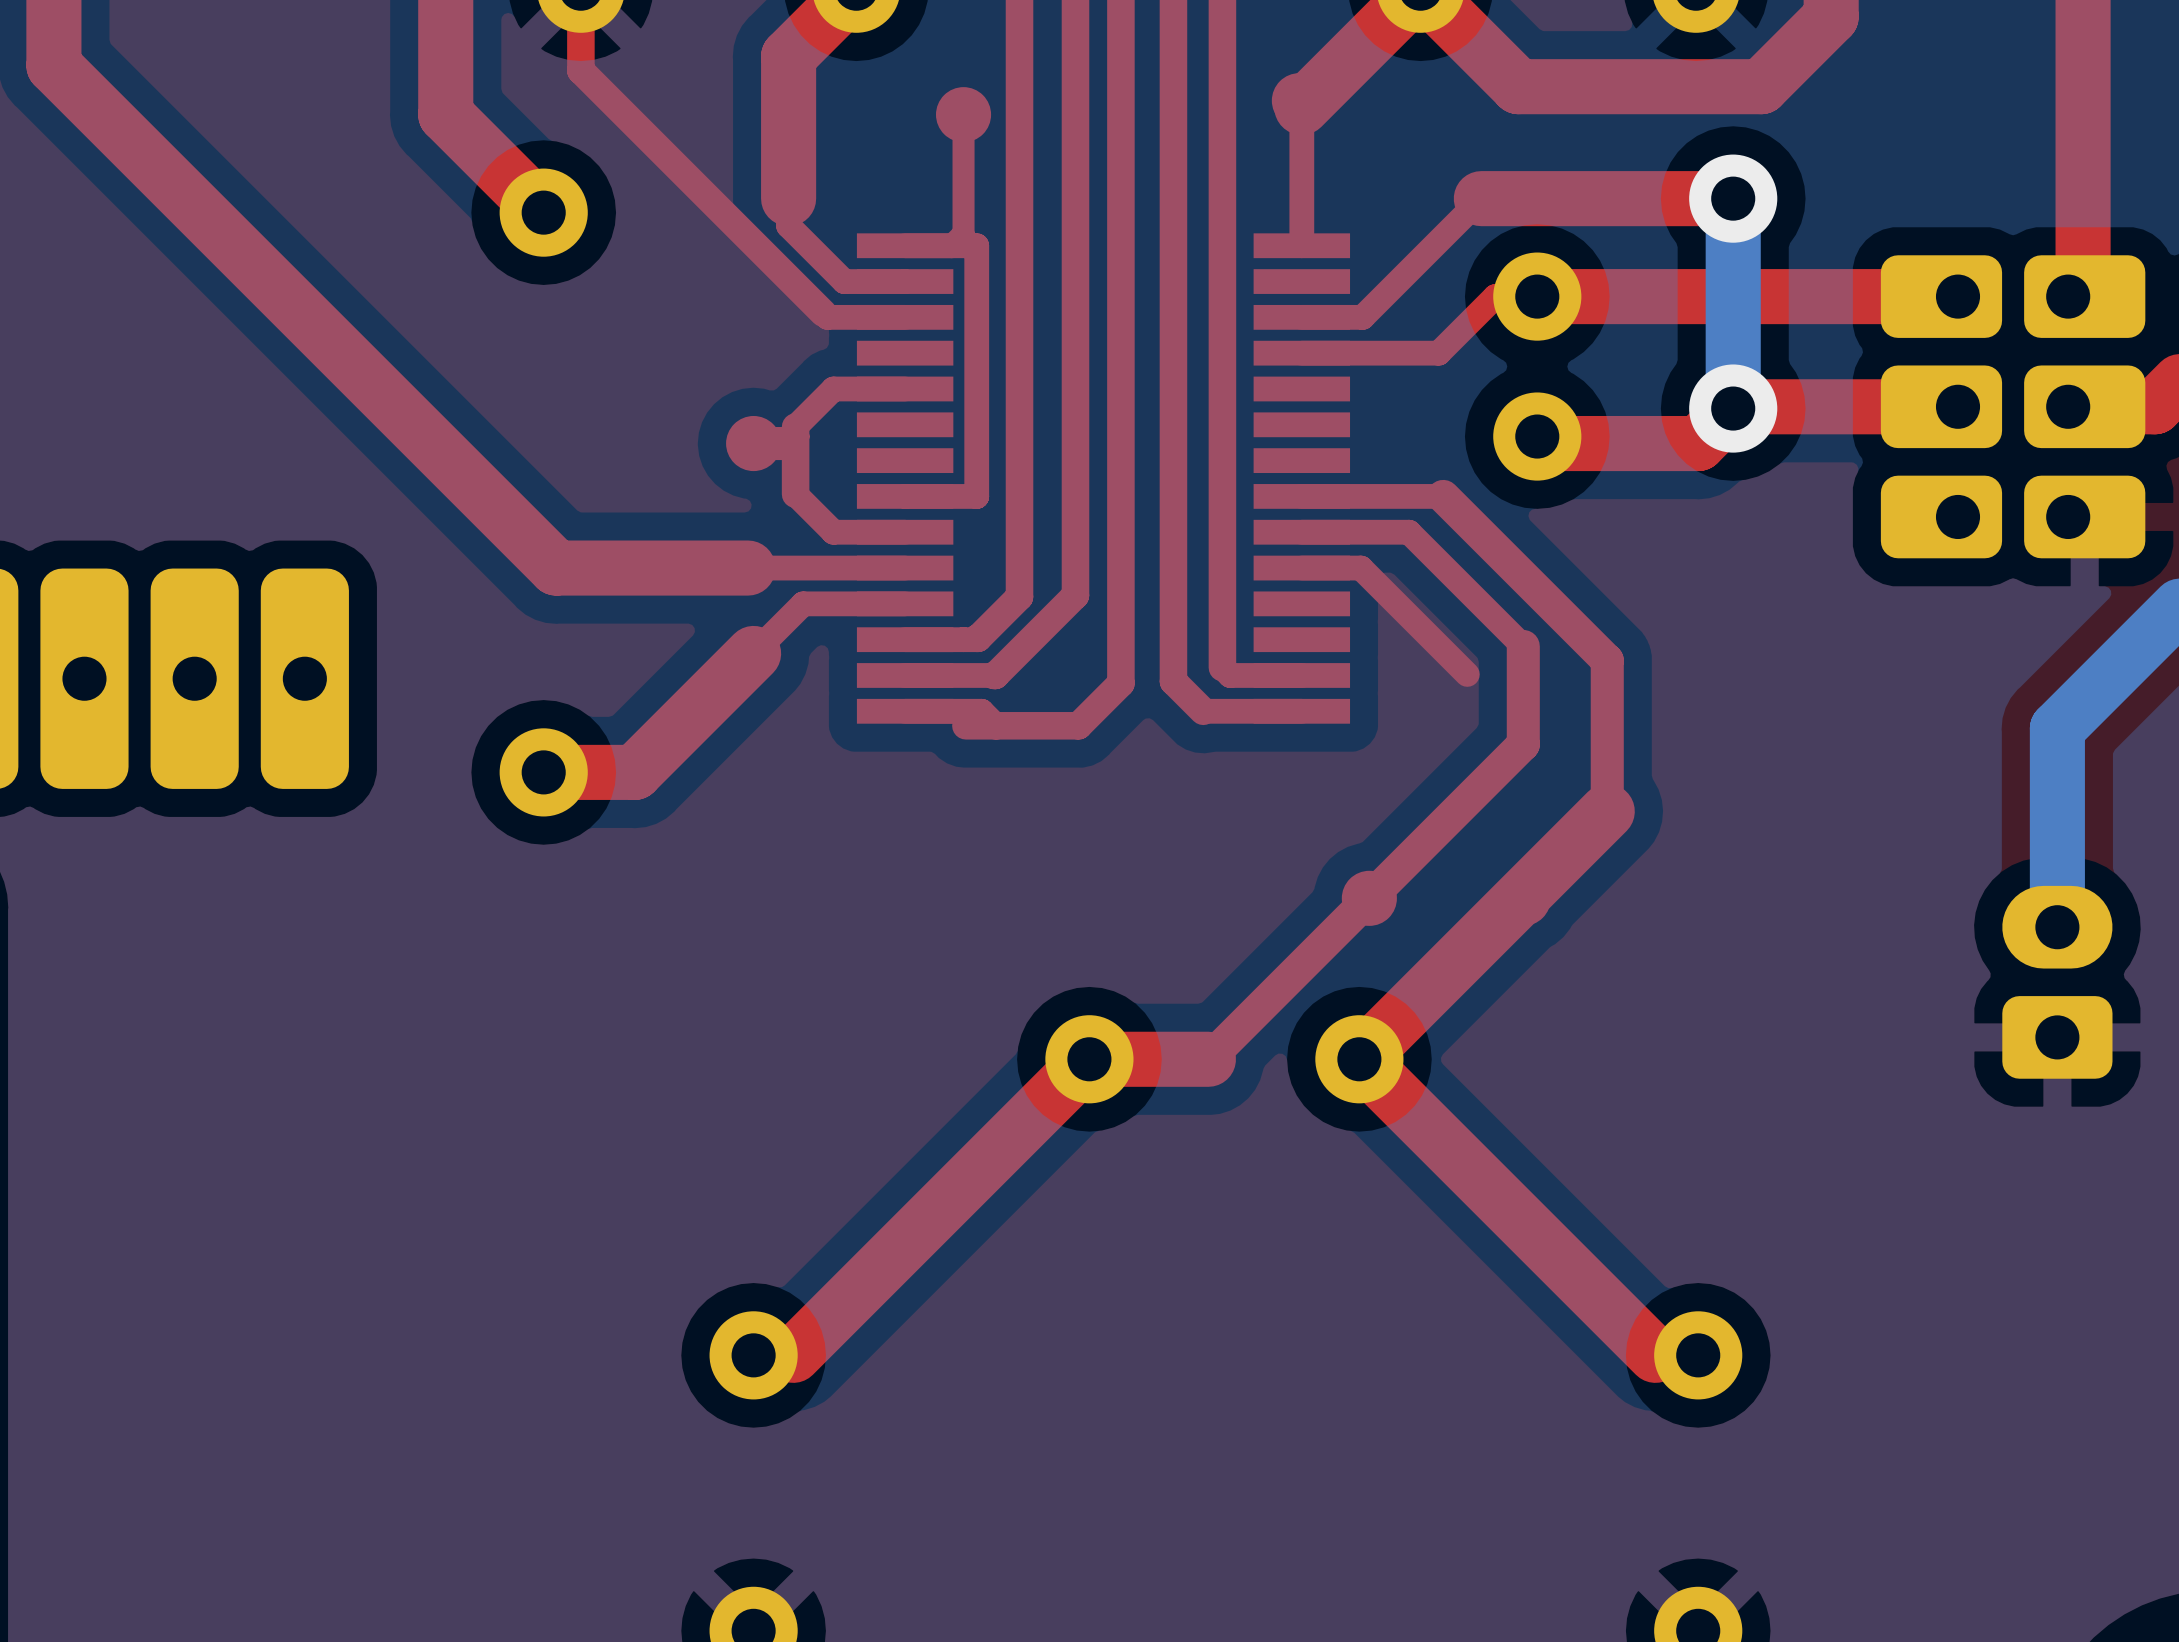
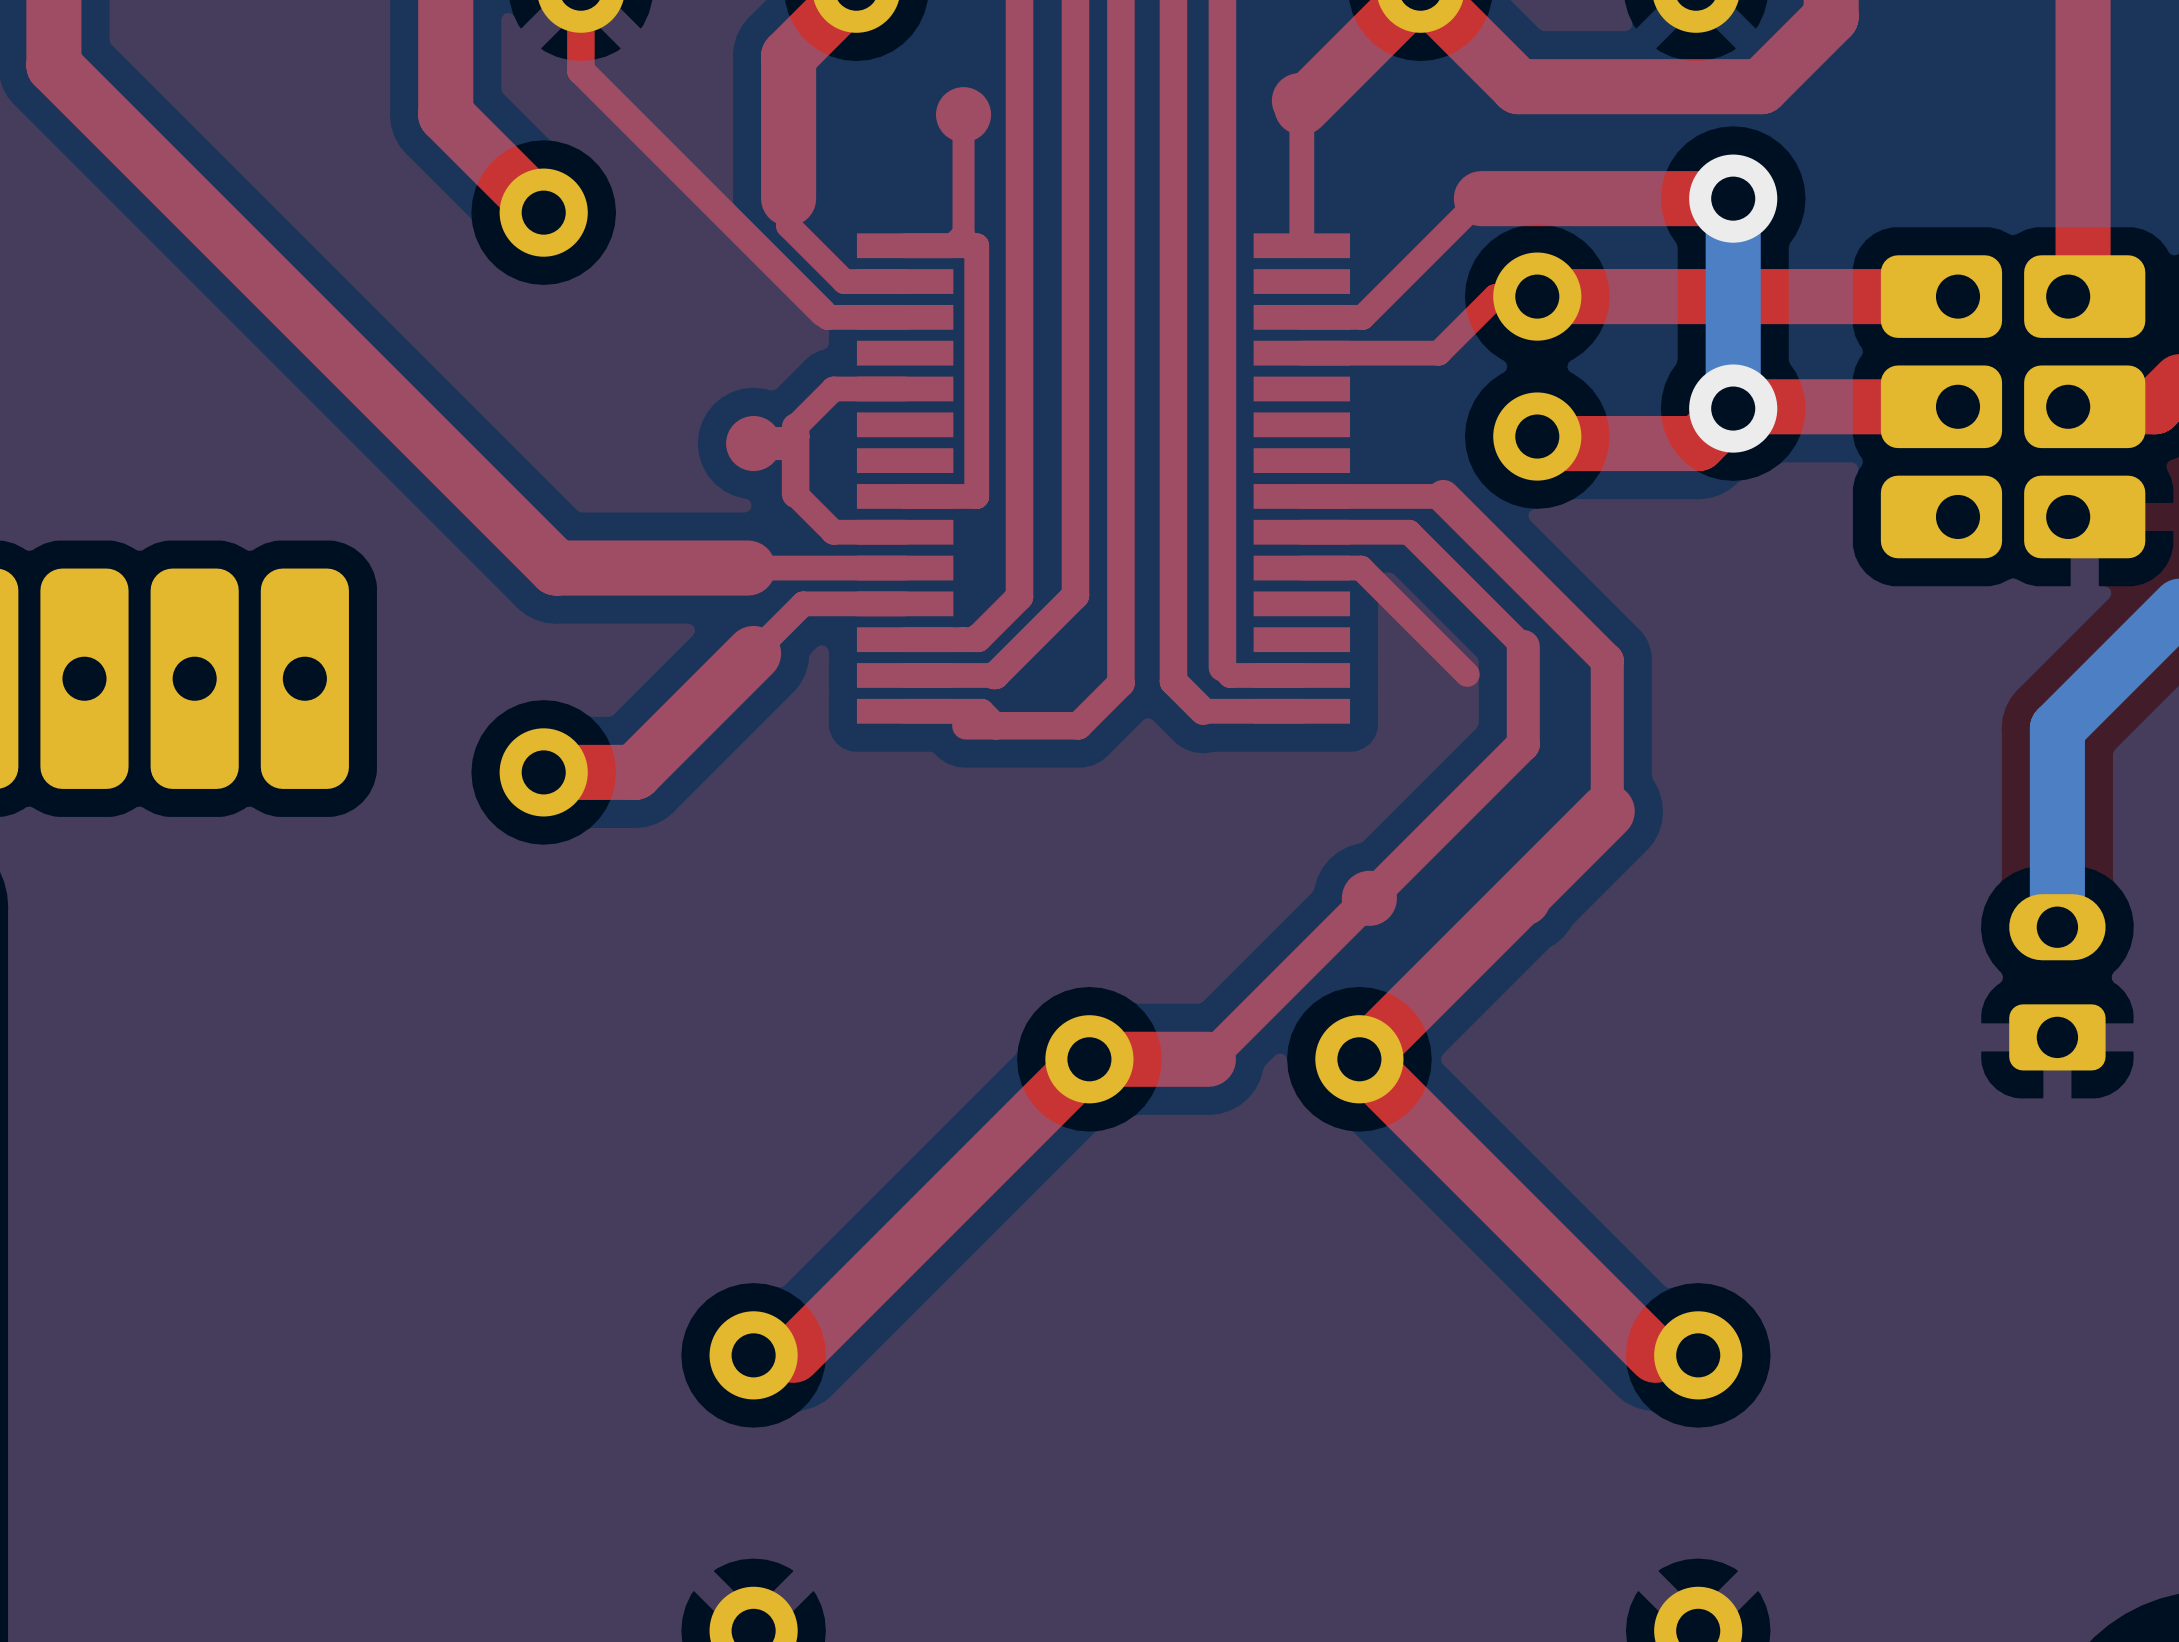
part footprint: [2002, 885, 2113, 1079] -> [2009, 894, 2106, 1071]

